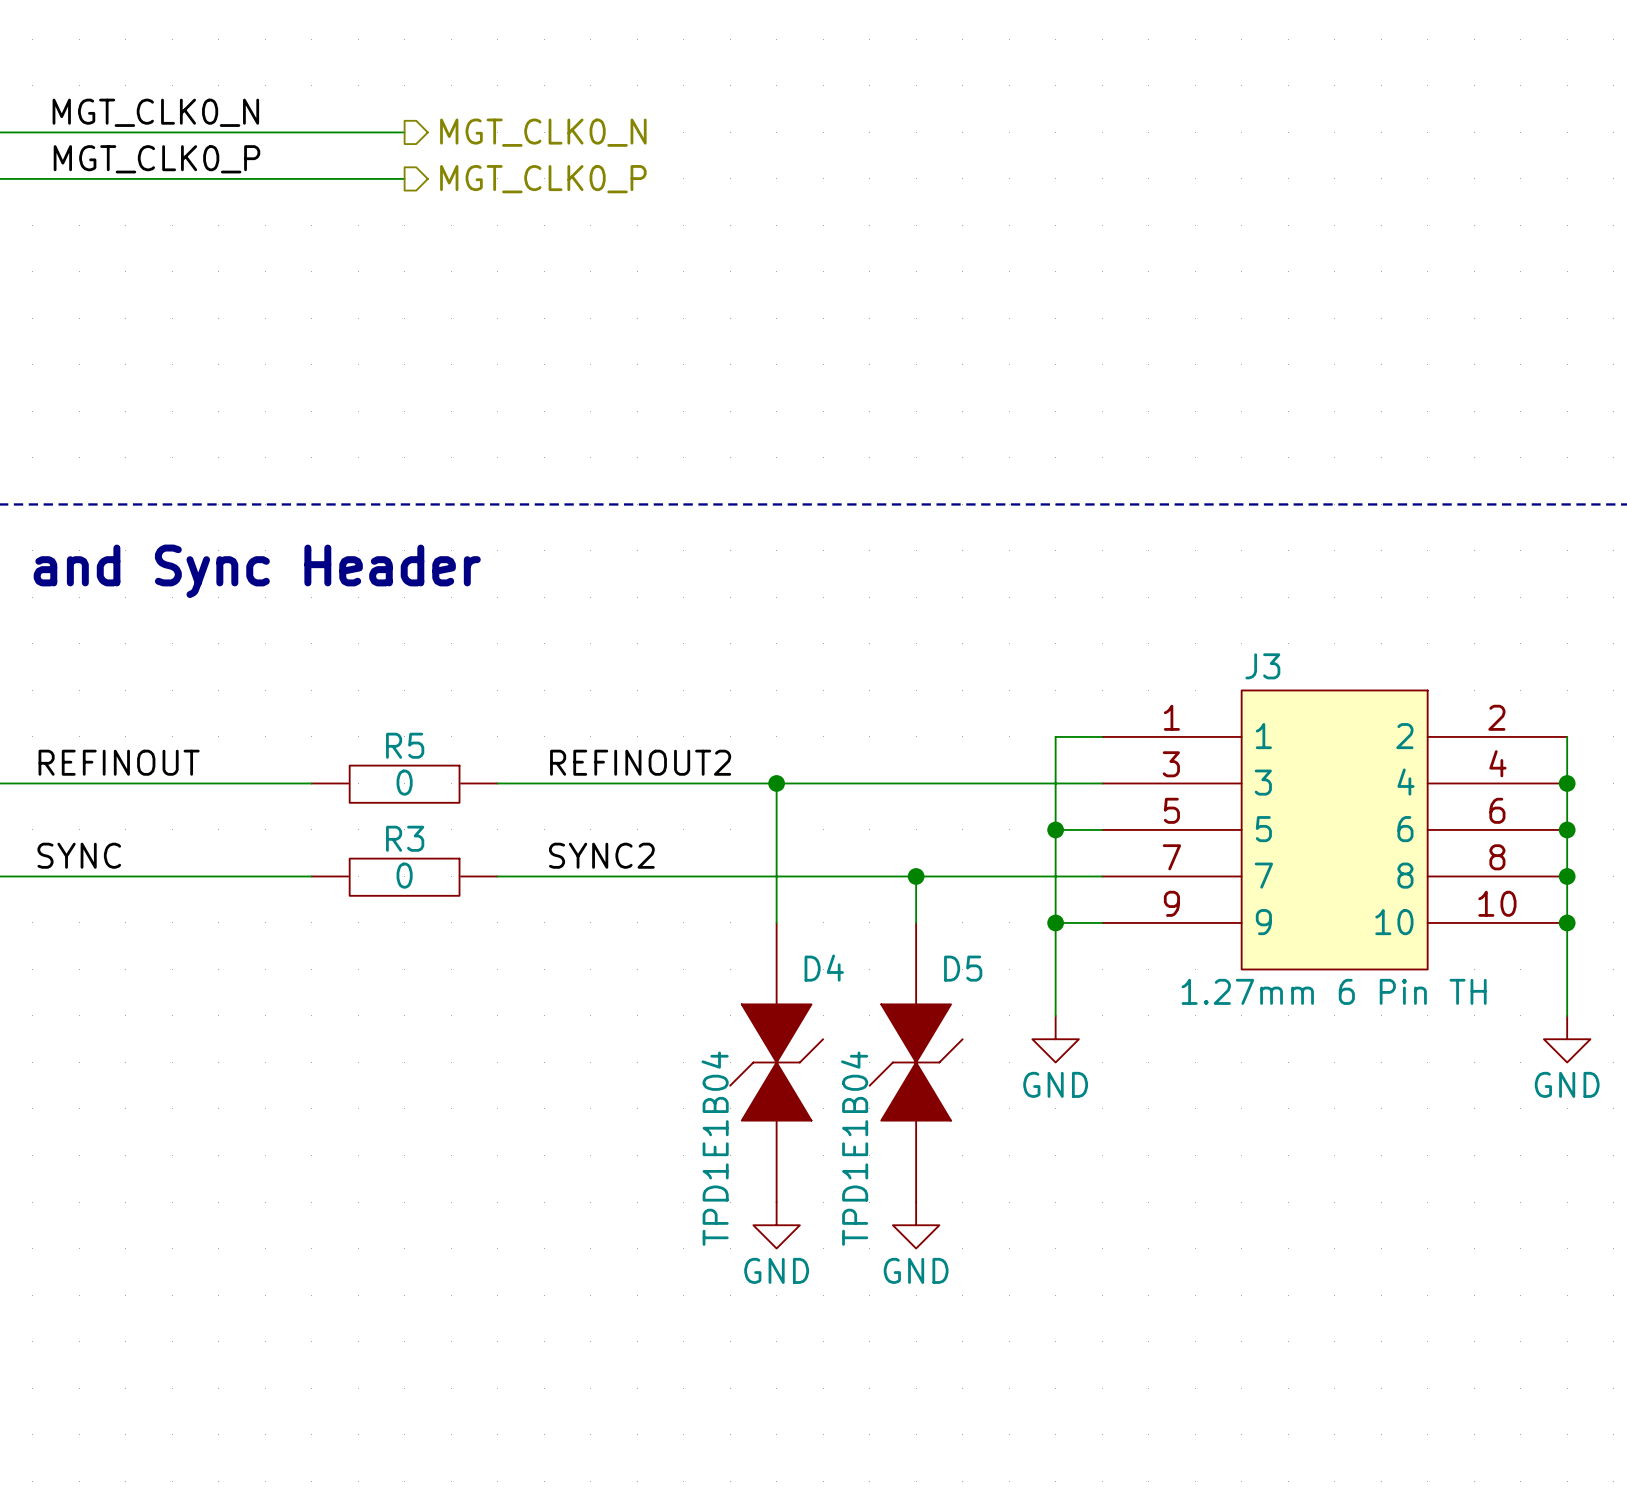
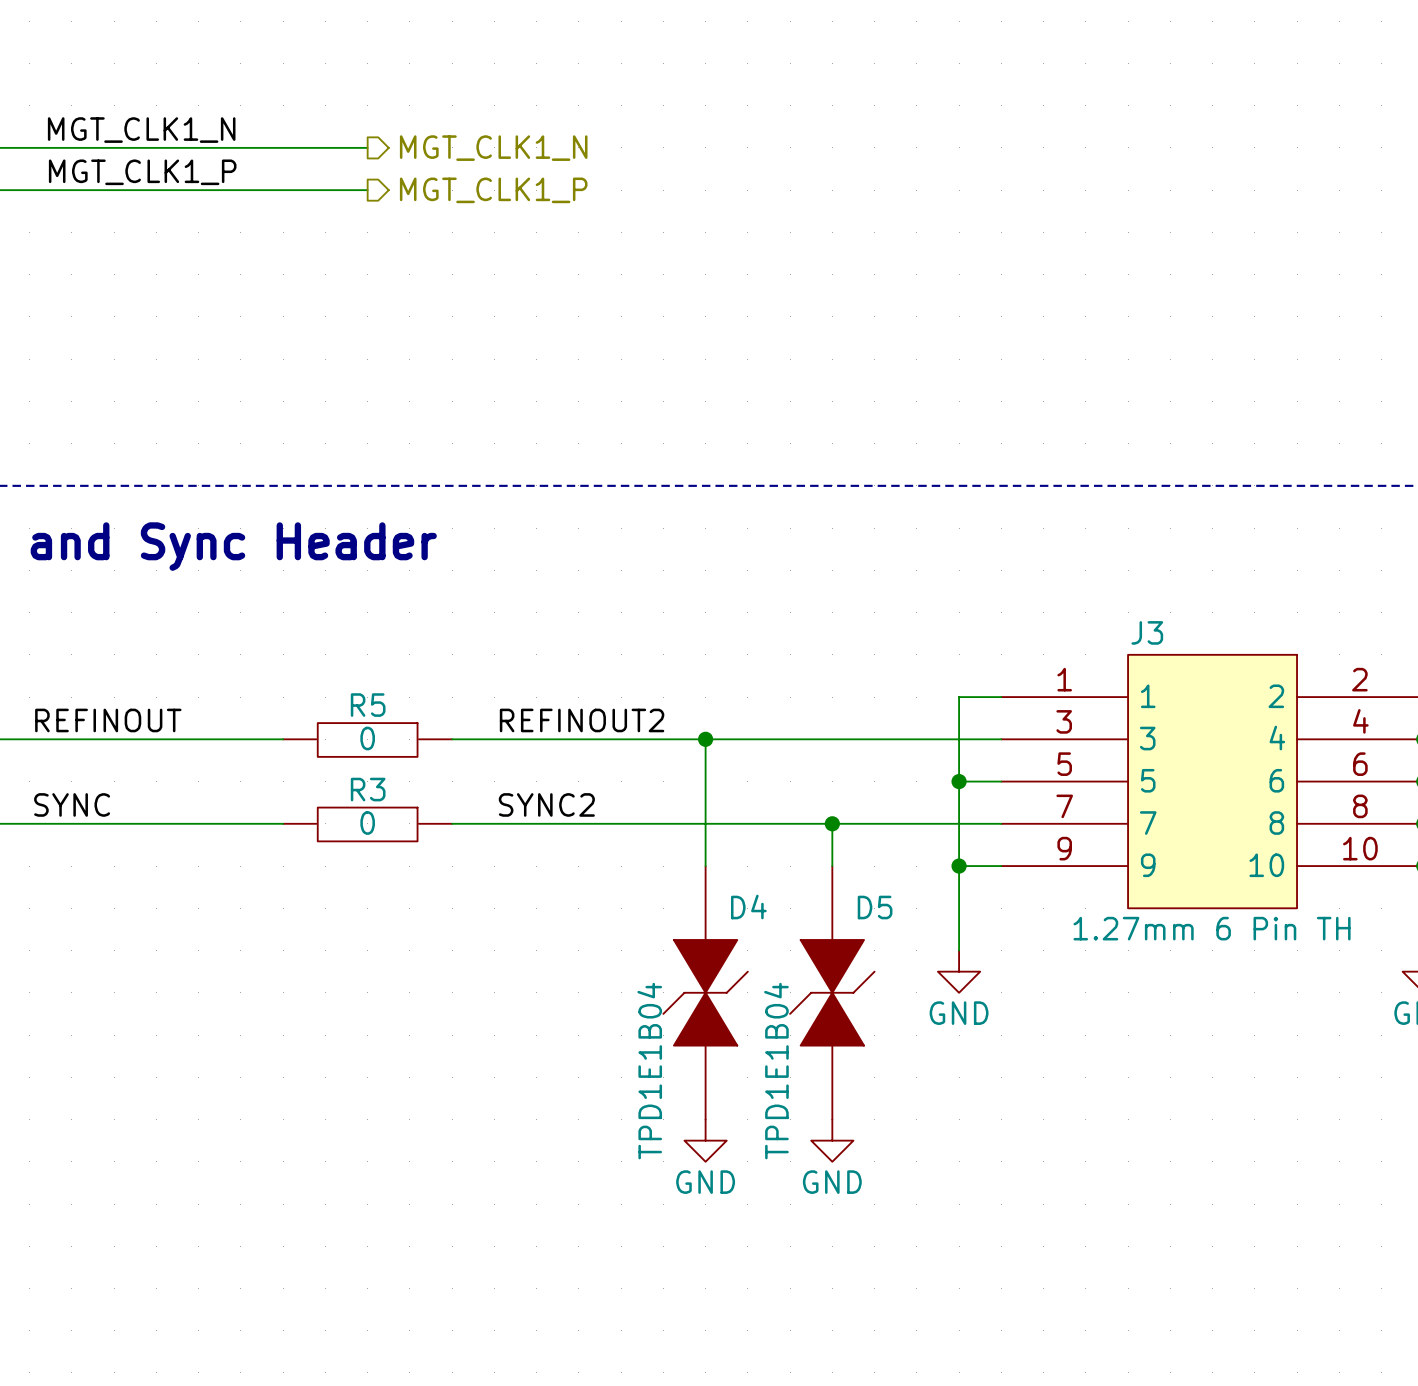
label: MGT_CLK0_N (155, 112) -> MGT_CLK1_N (141, 130)
hierarchical label: MGT_CLK0_N (543, 132) -> MGT_CLK1_N (493, 148)
label: MGT_CLK0_P (156, 159) -> MGT_CLK1_P (142, 172)
hierarchical label: MGT_CLK0_P (543, 179) -> MGT_CLK1_P (493, 190)

